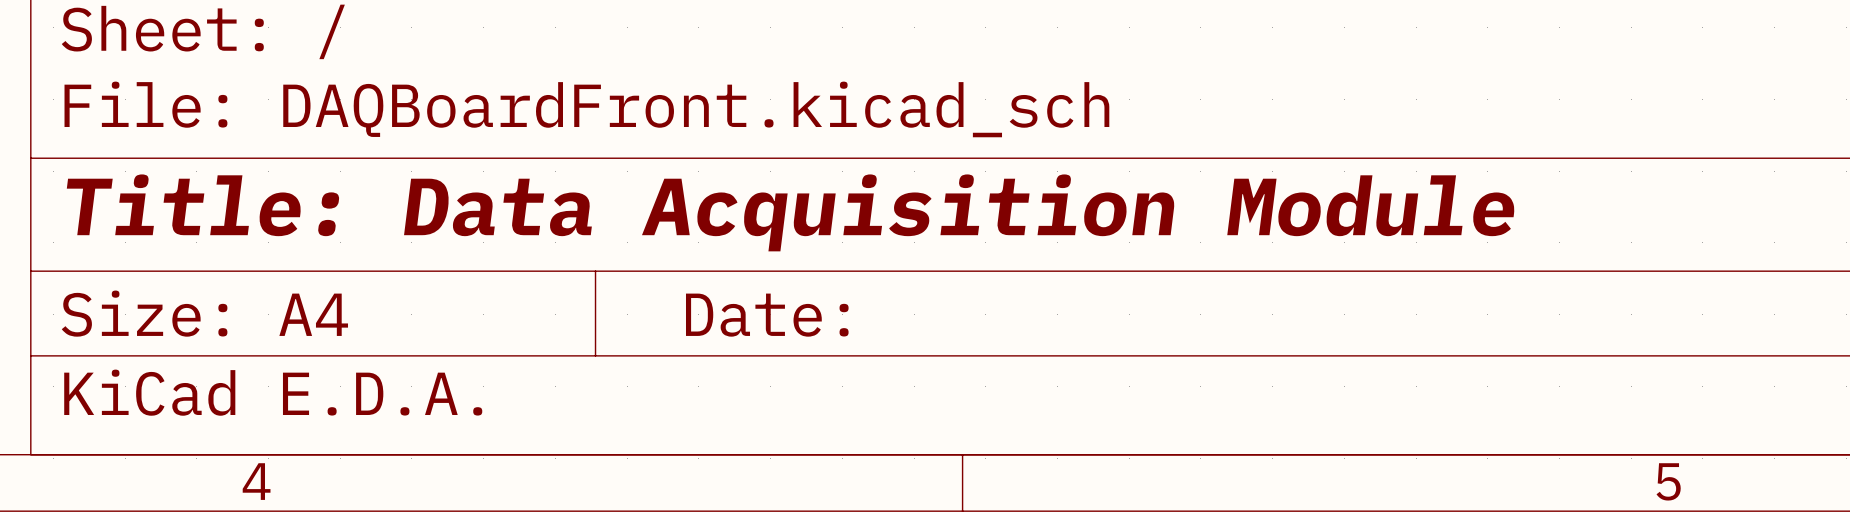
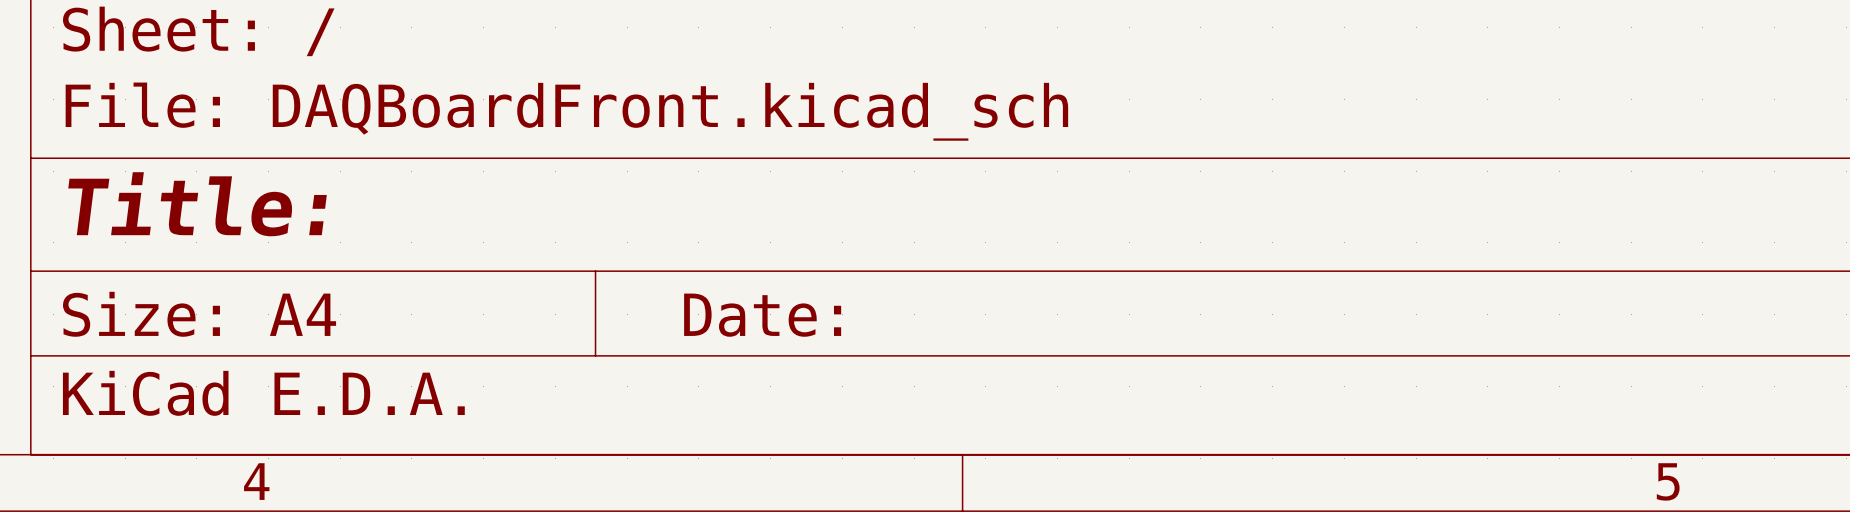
title block: Title: Data Acquisition Module (790, 212) -> Title: (197, 204)

